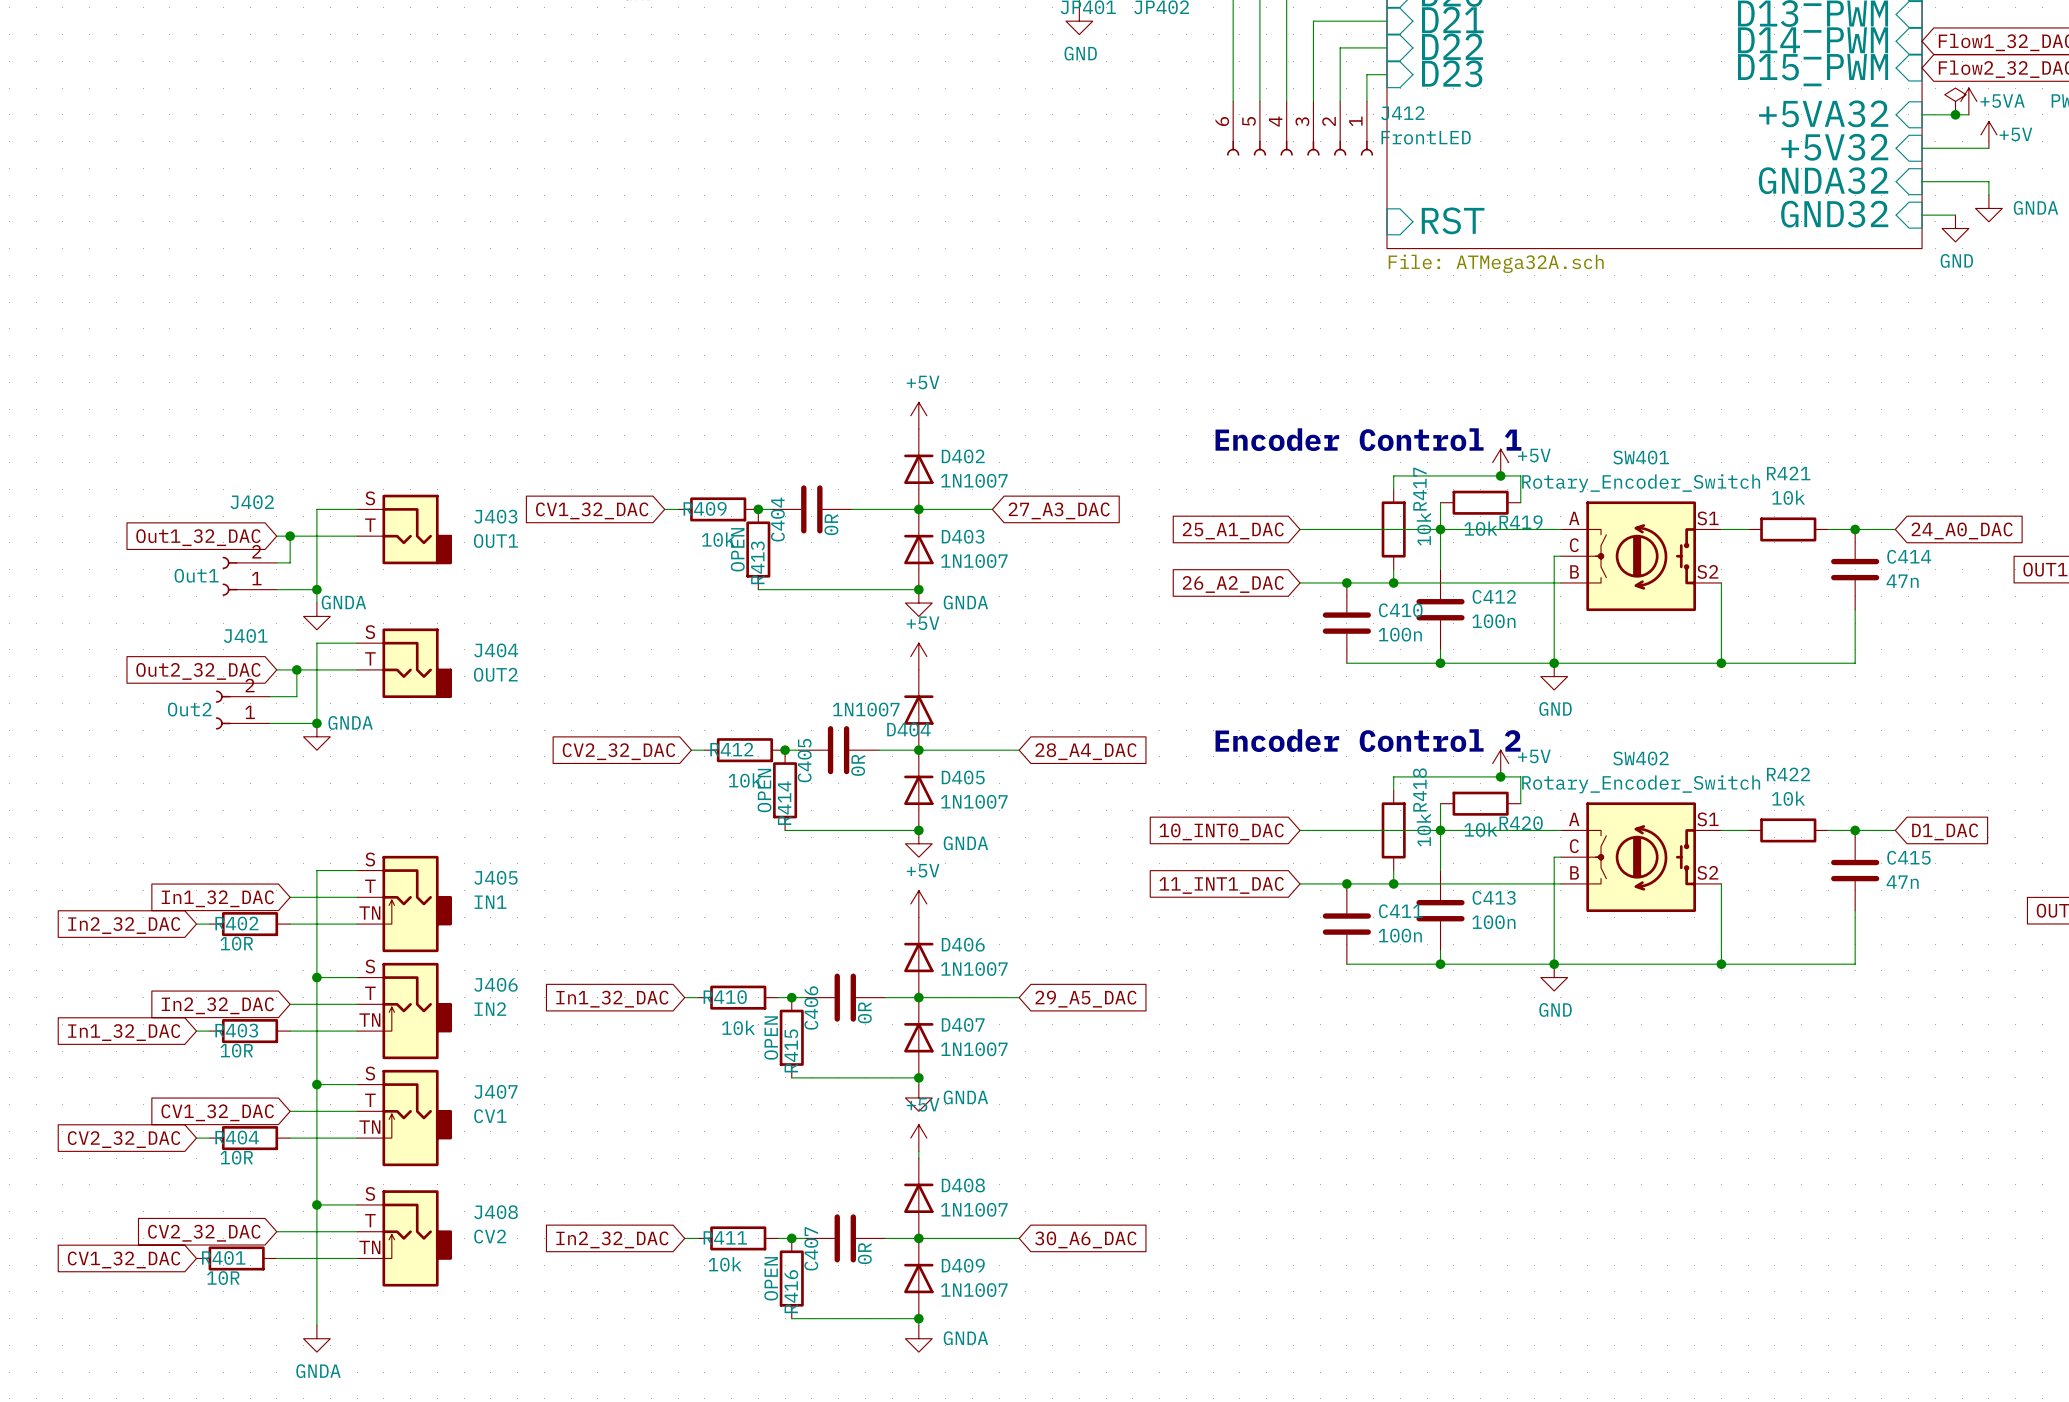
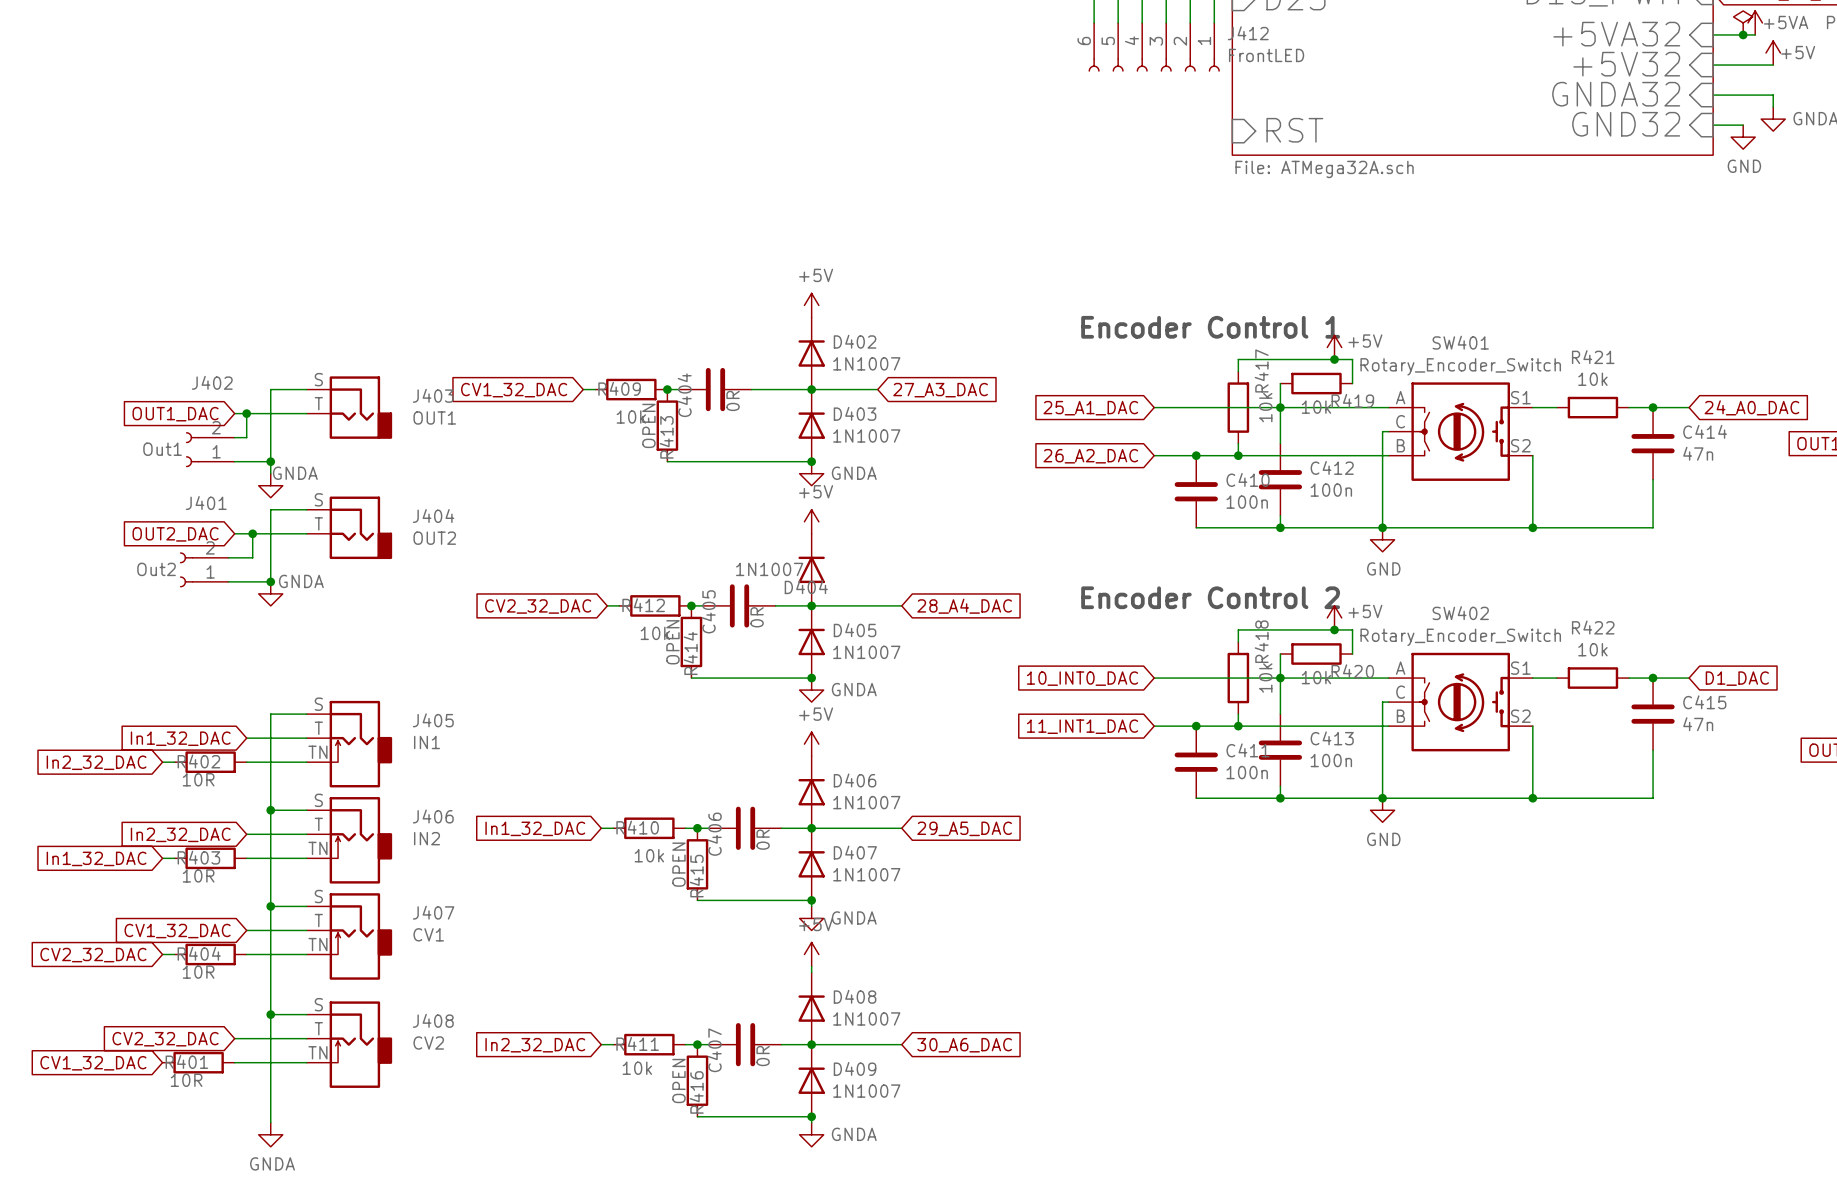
global label: Out1_32_DAC (198, 537) -> OUT1_DAC (175, 414)
global label: Out2_32_DAC (198, 671) -> OUT2_DAC (175, 534)

